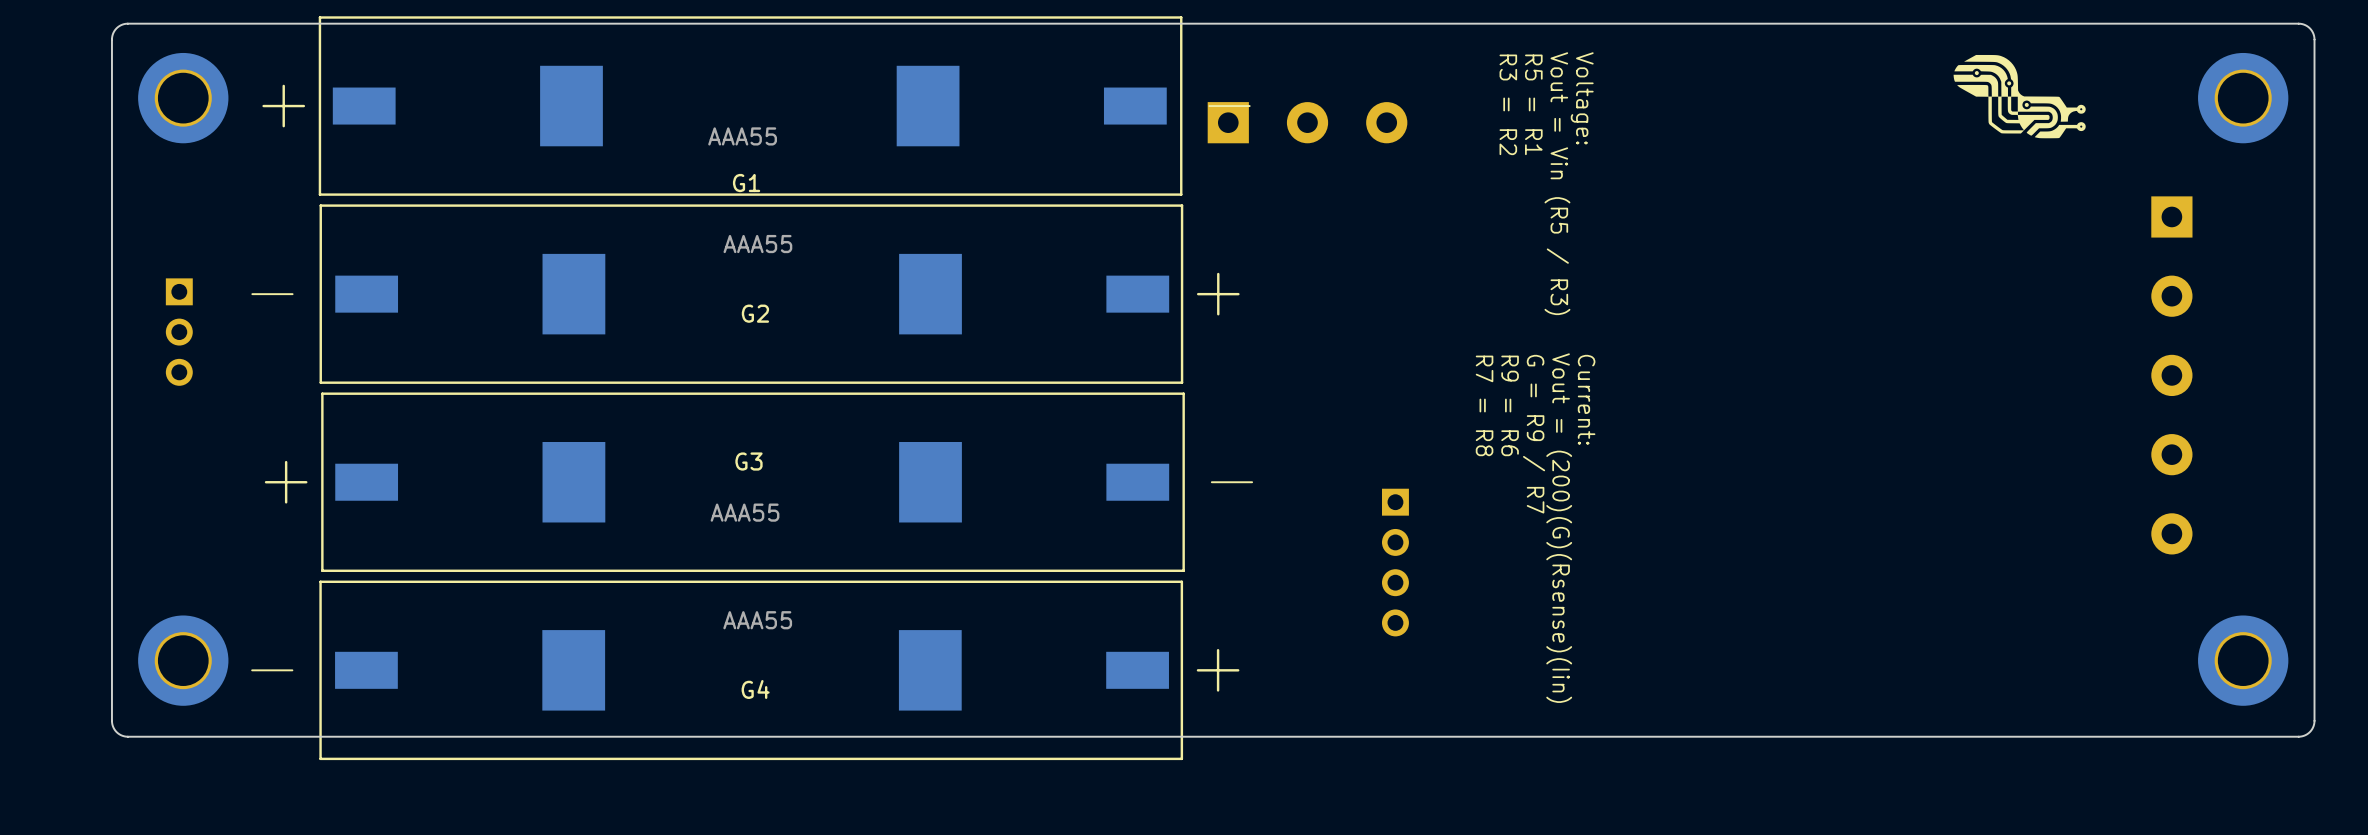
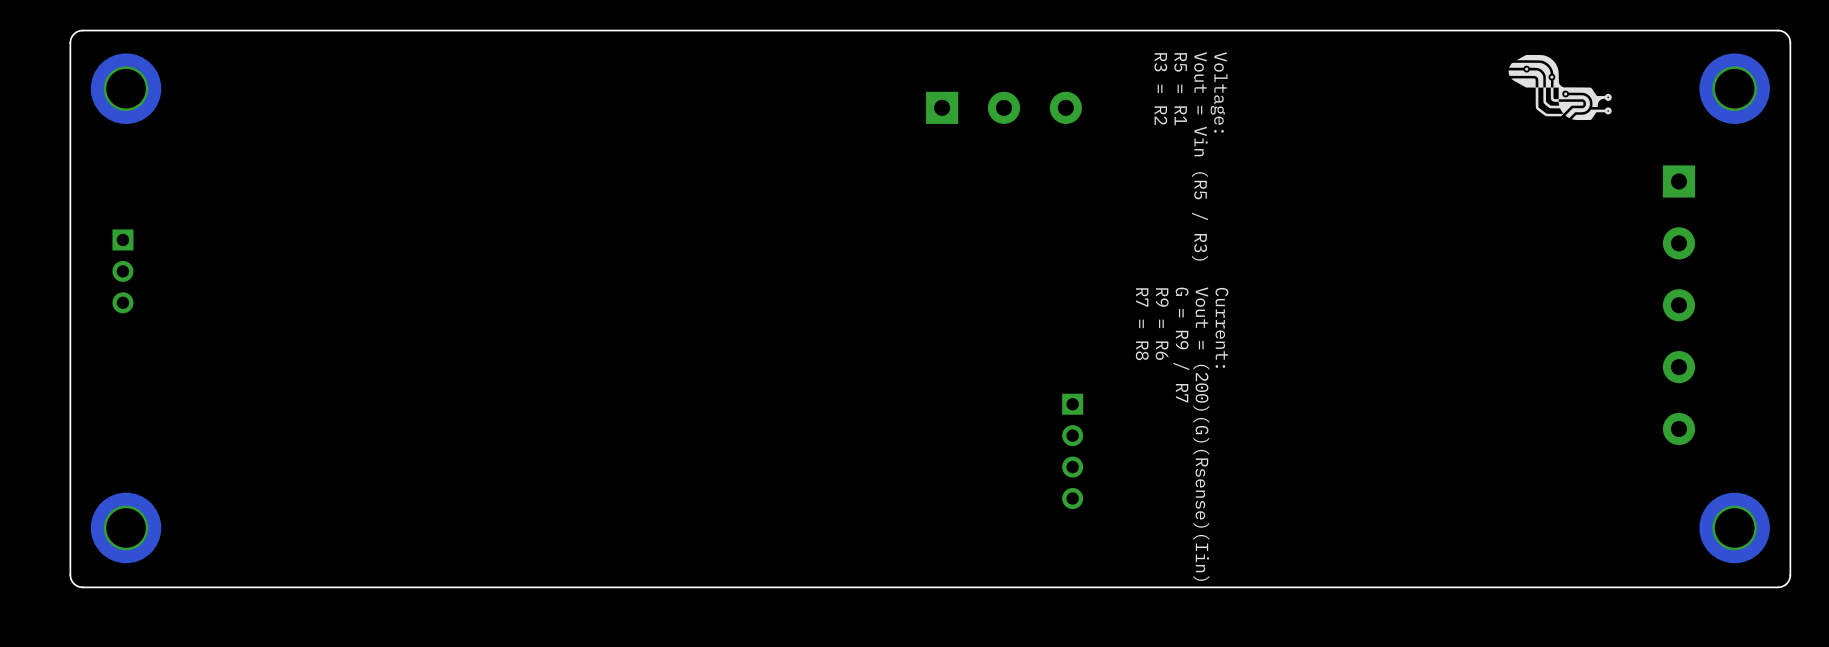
G1: AAA55 (756, 106) -> none
G2: AAA55 (745, 294) -> none
G3: AAA55 (758, 482) -> none
G4: AAA55 (745, 670) -> none

